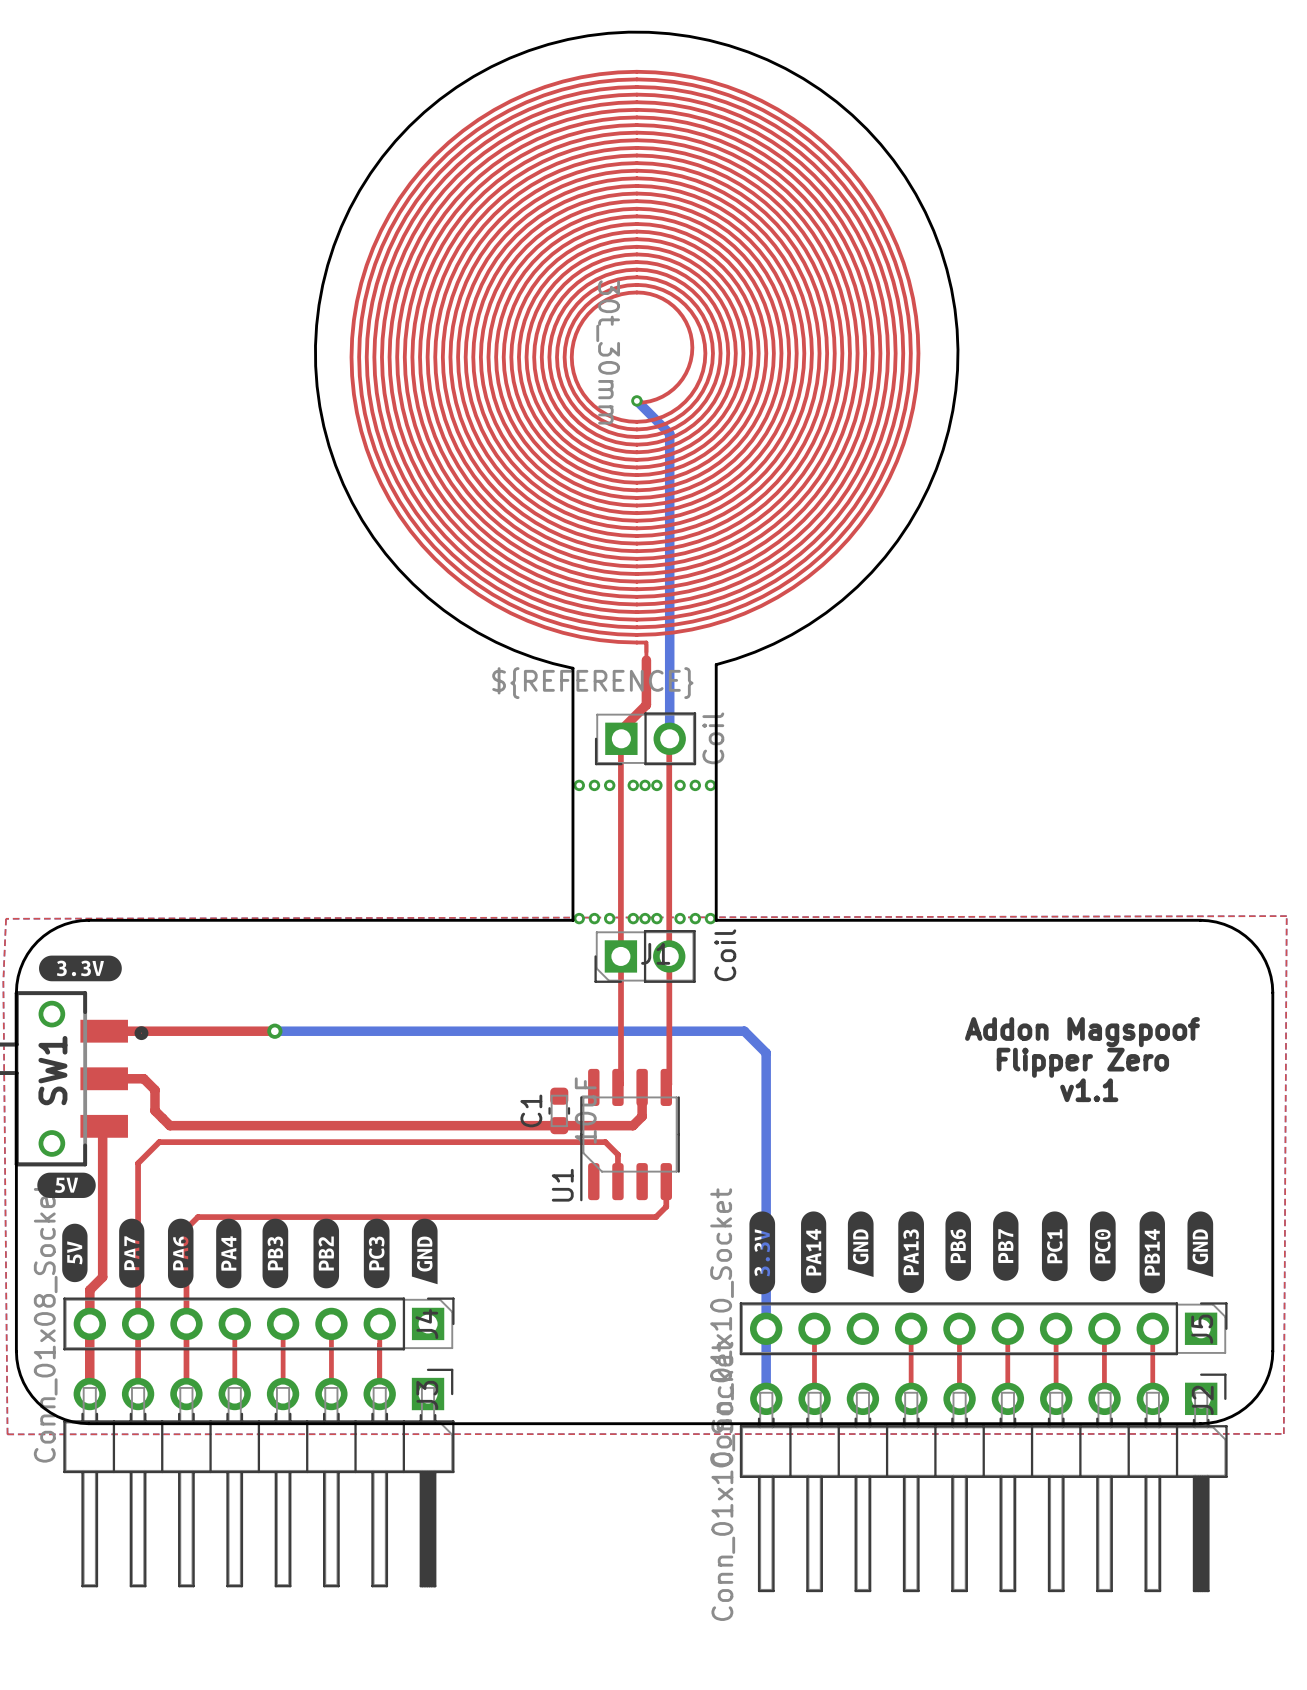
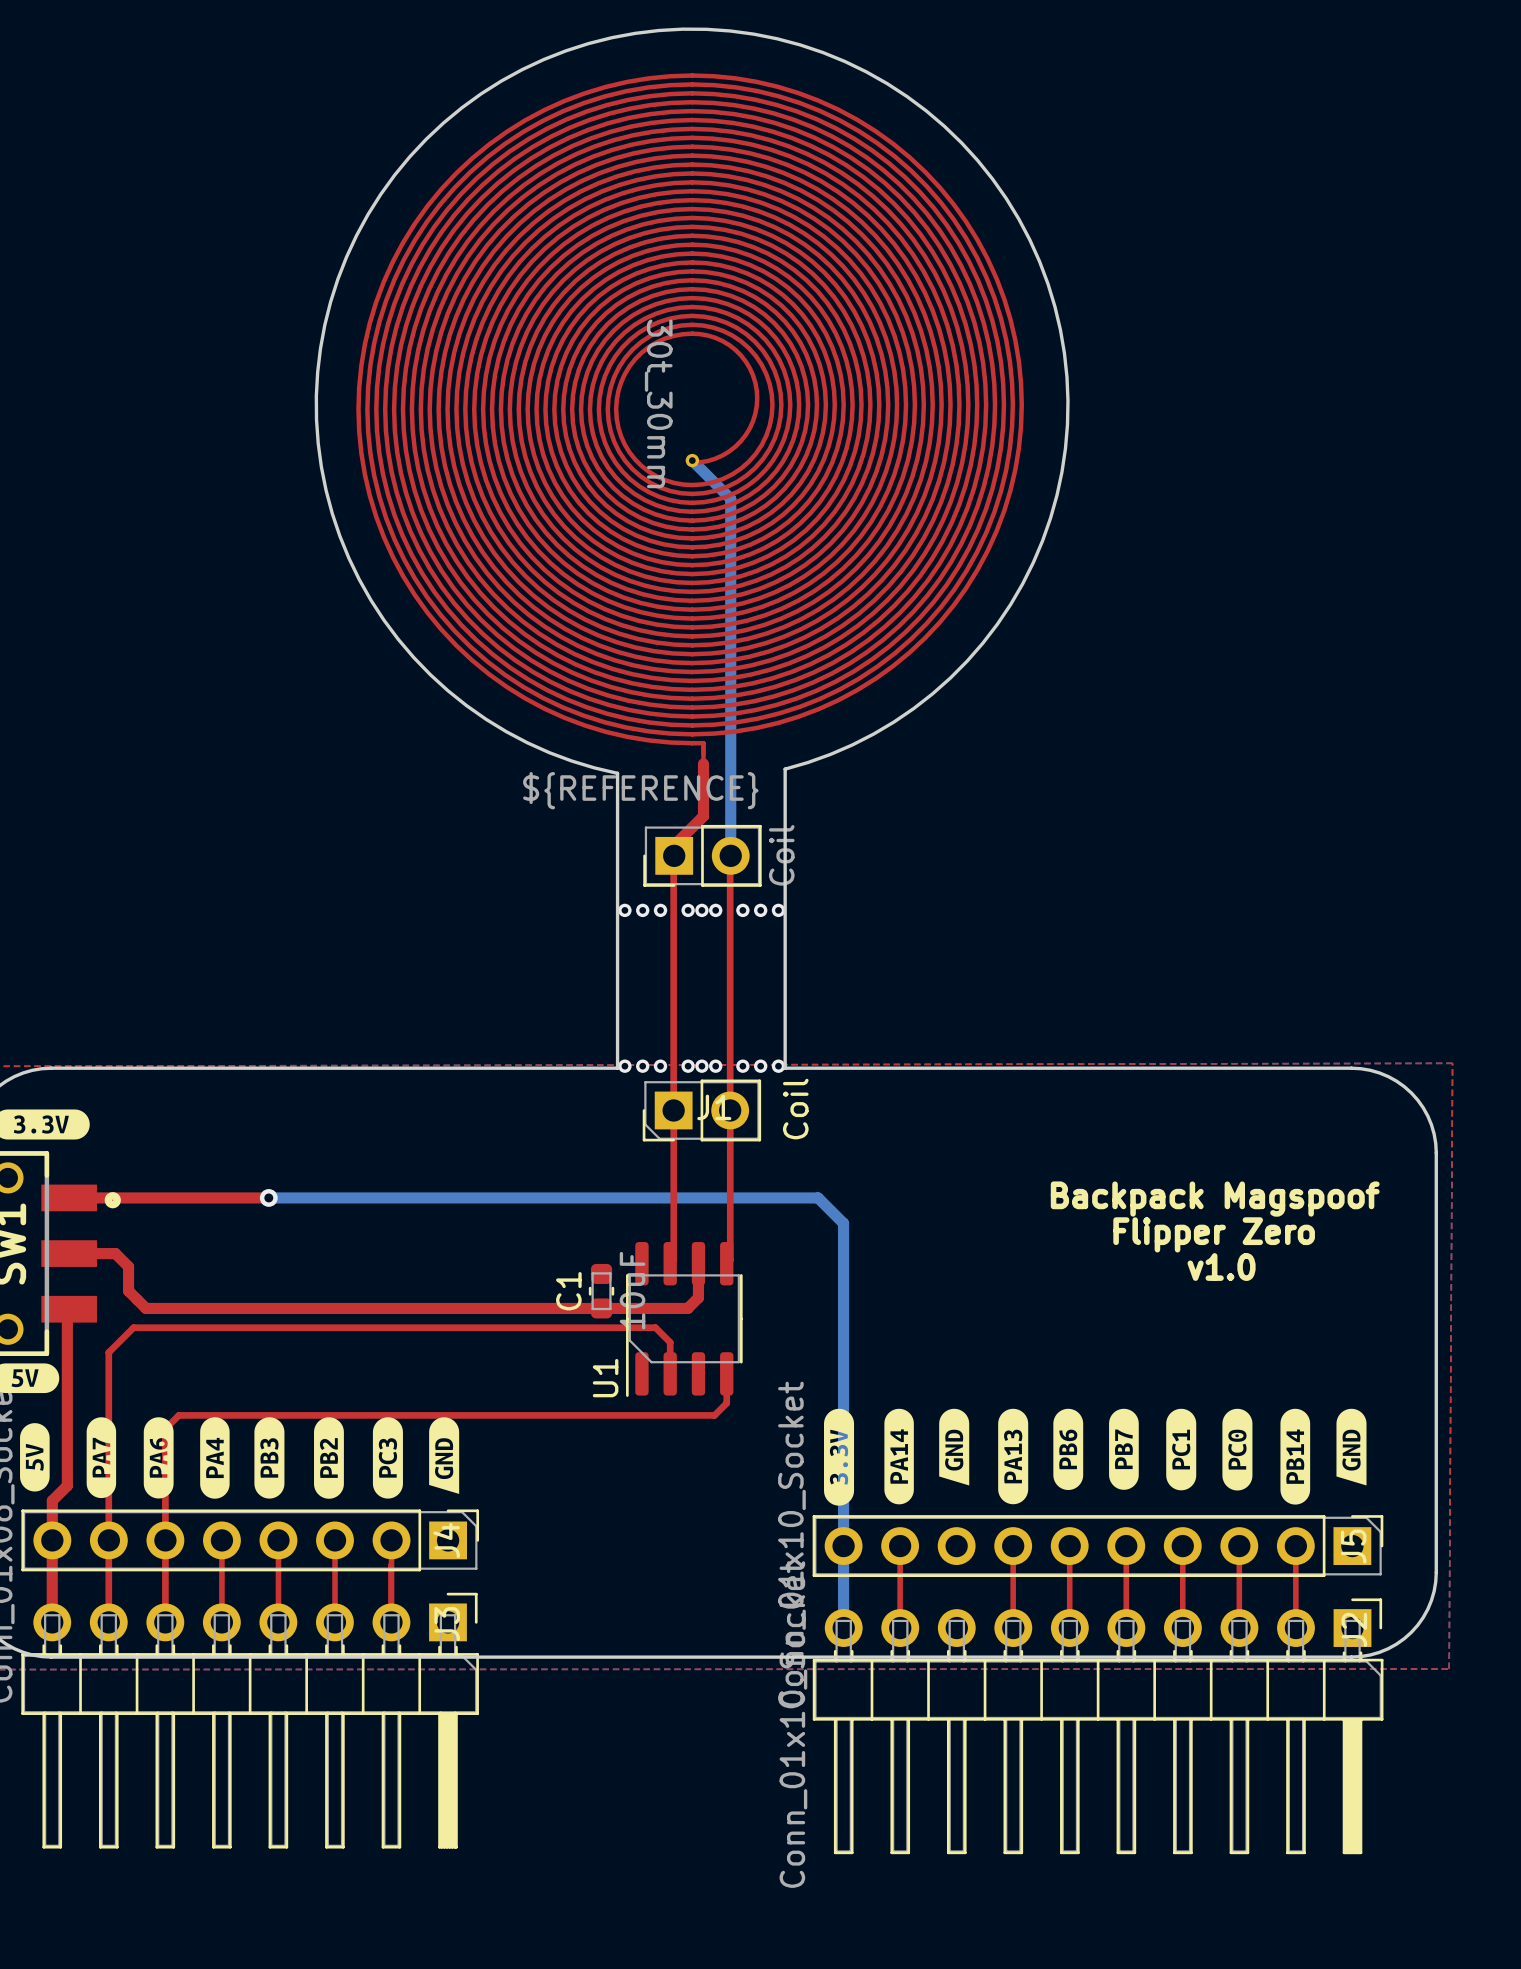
text: Addon Magspoof (1082, 1032) -> Backpack Magspoof (1215, 1199)
text: v1.1 (1089, 1090) -> v1.0 (1221, 1267)

